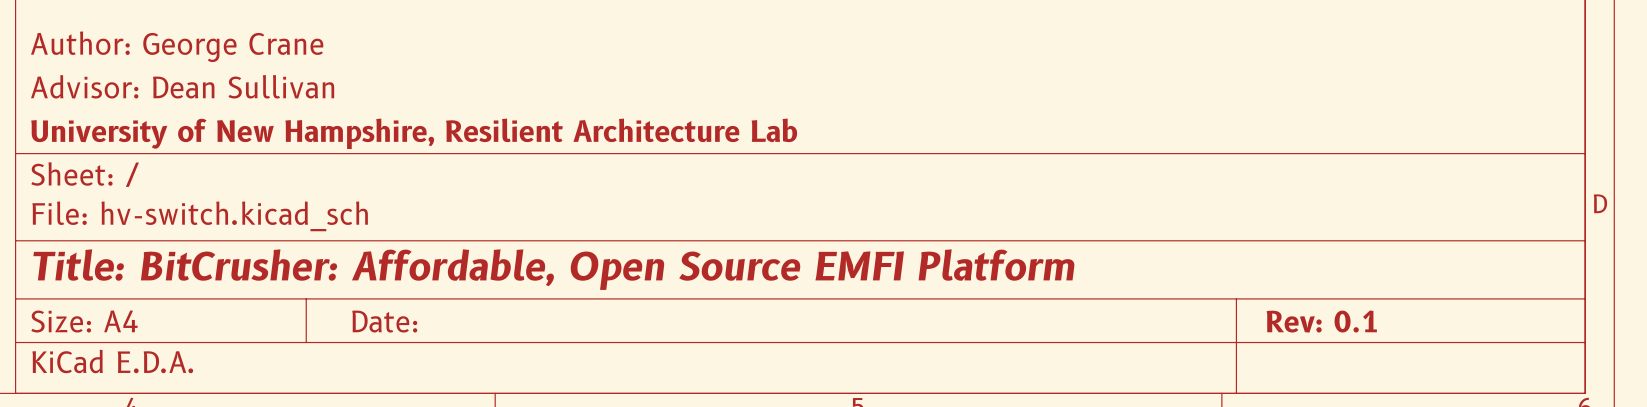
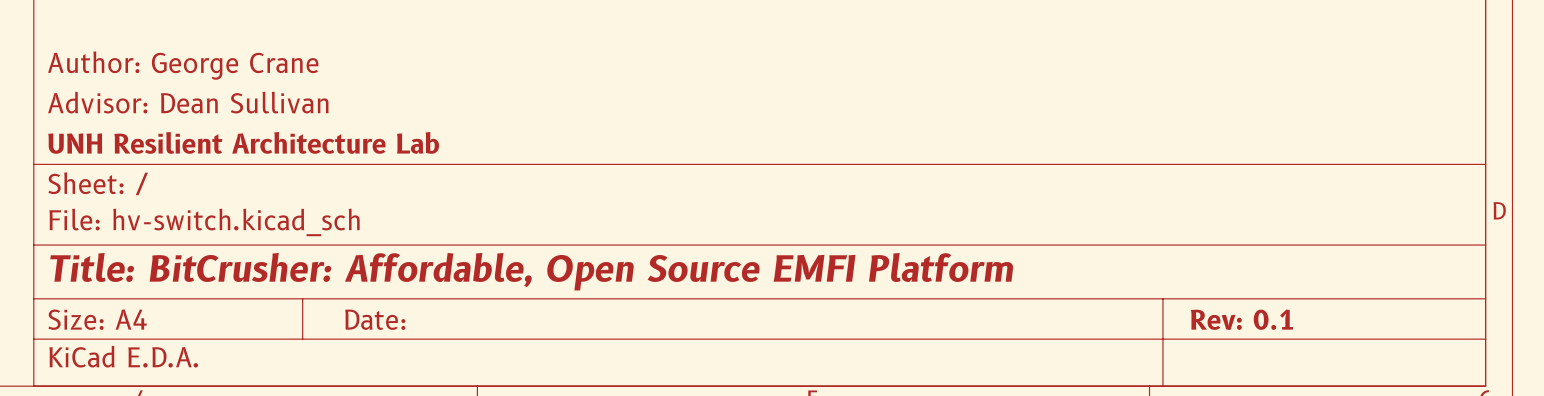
title block: University of New Hampshire, Resilient Architecture Lab (414, 133) -> UNH Resilient Architecture Lab (243, 142)

